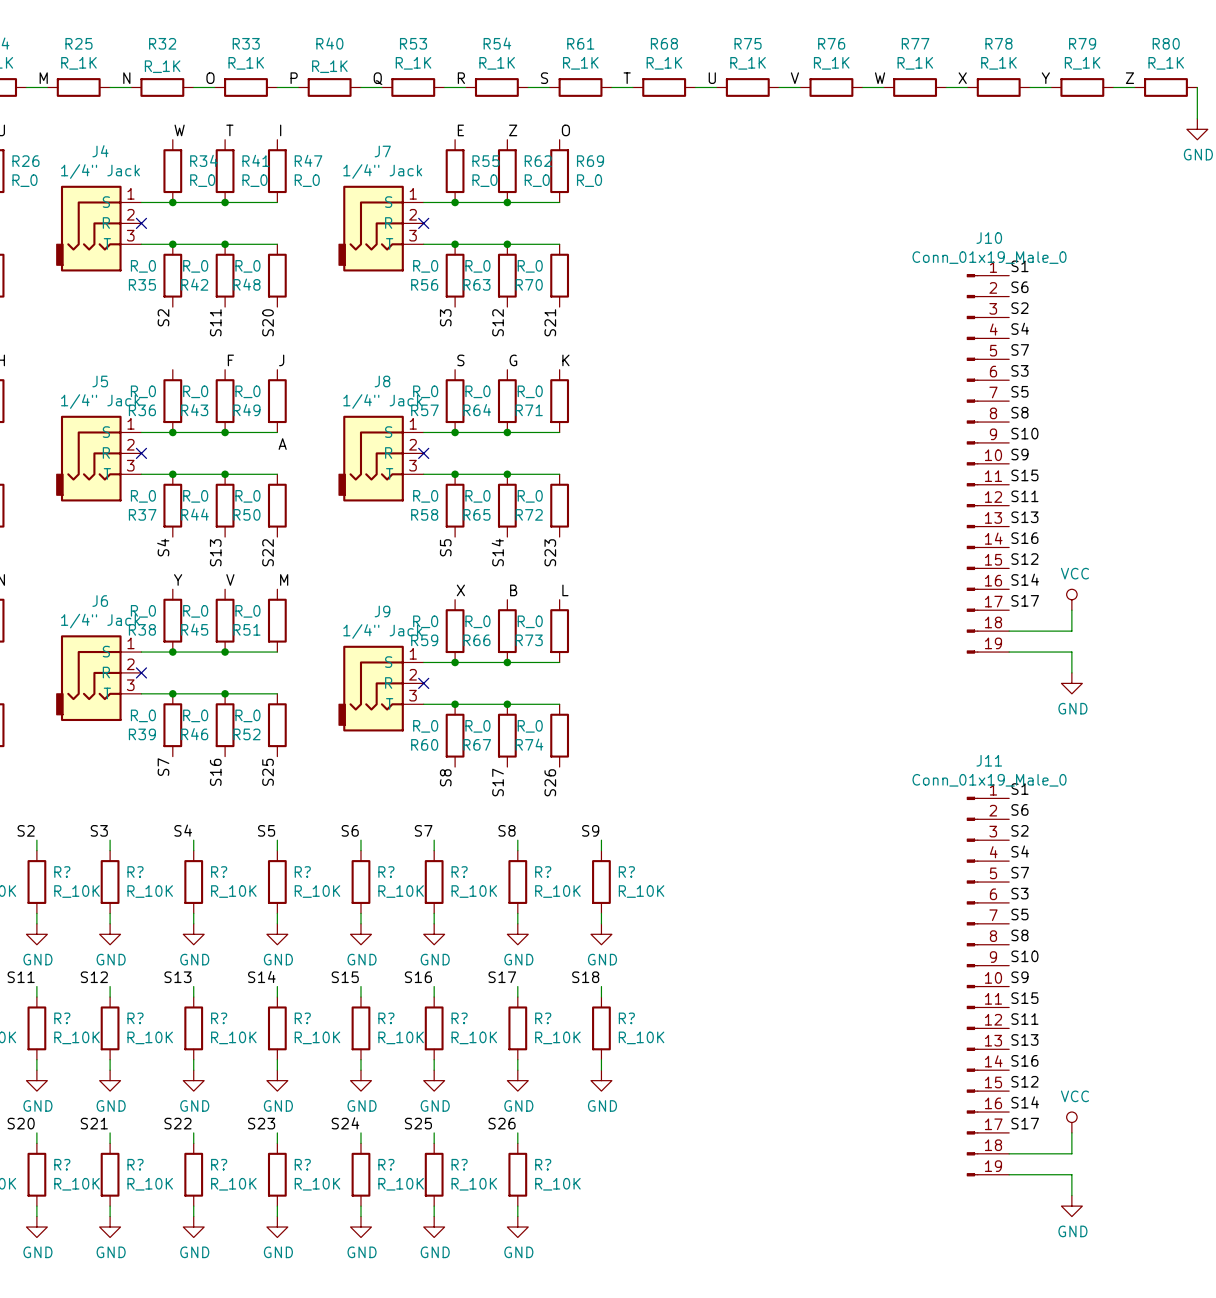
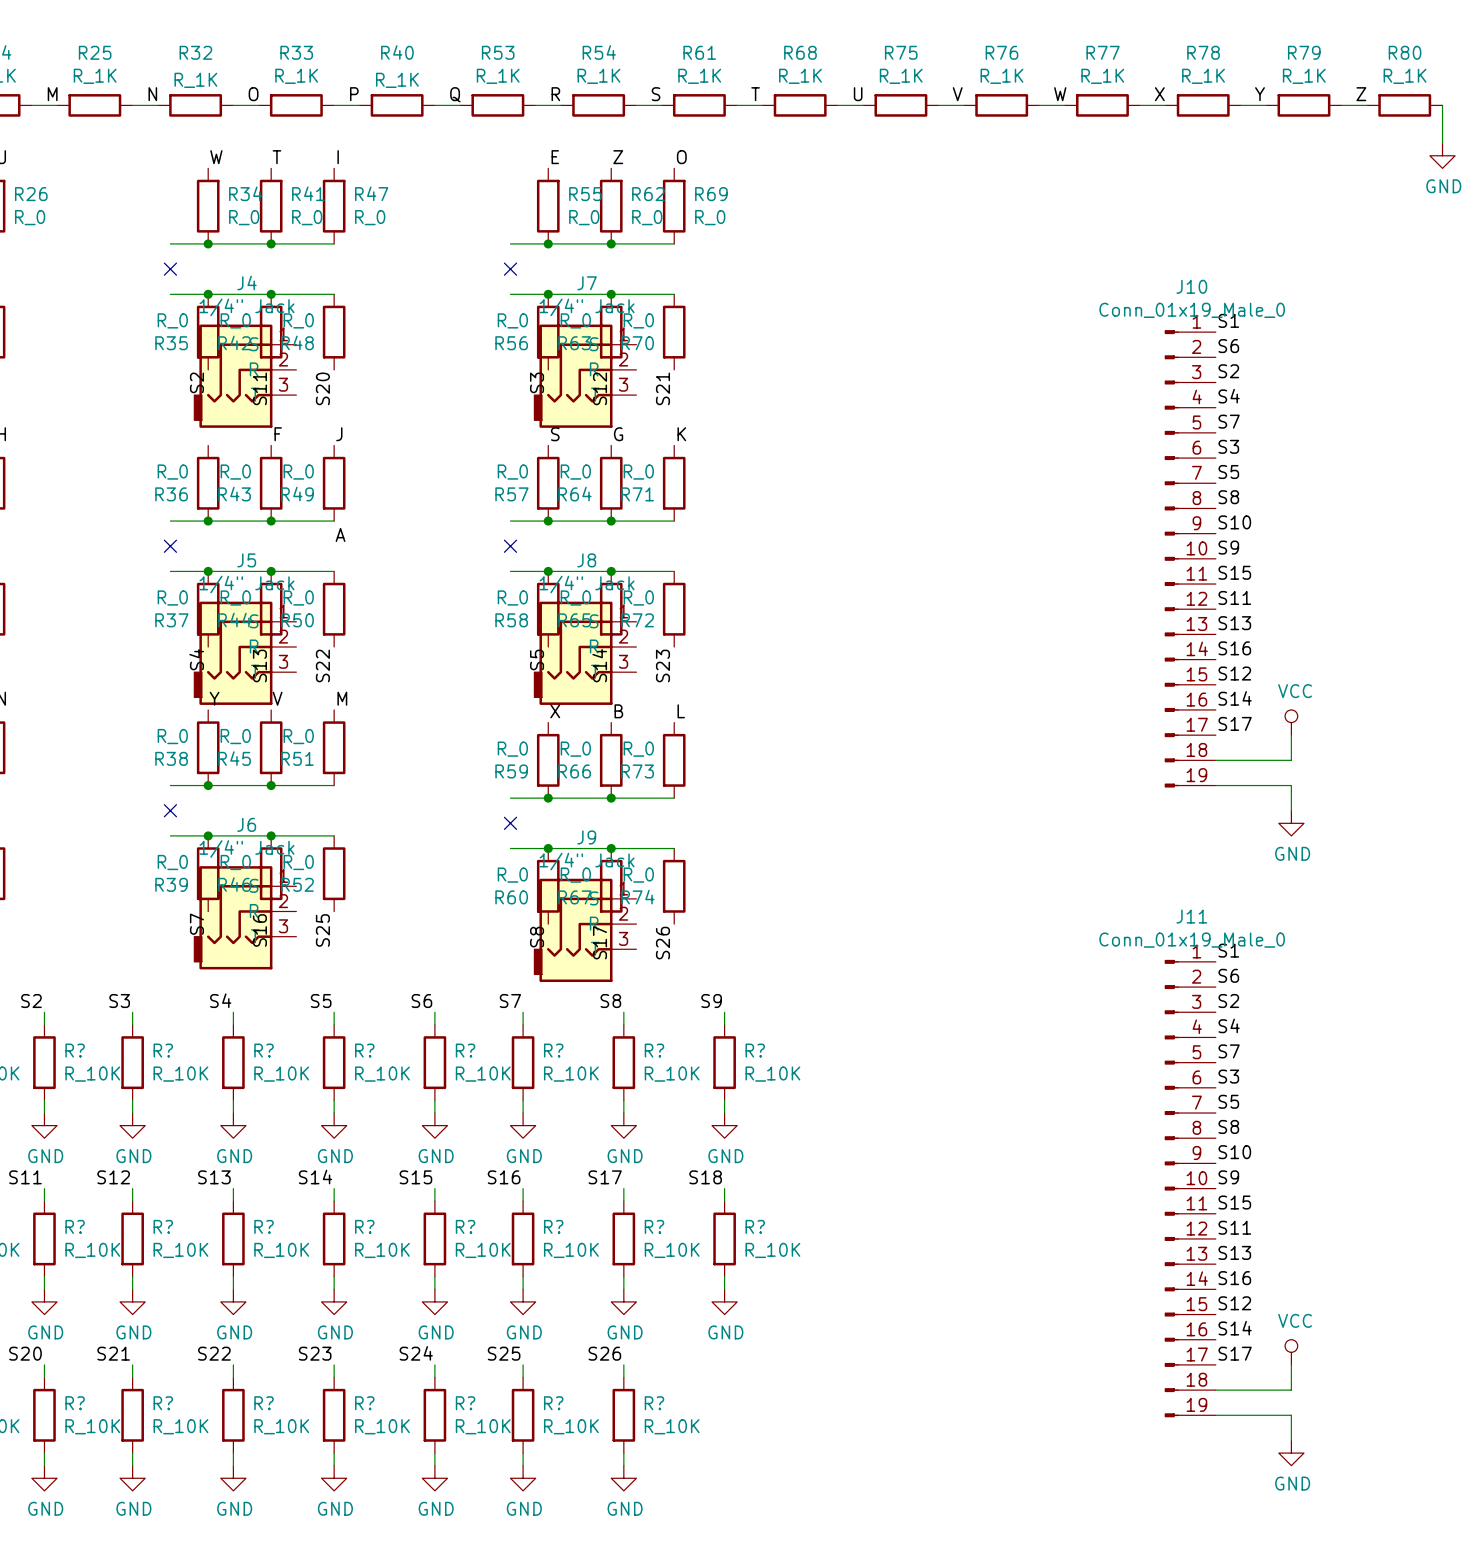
J4 position: (99, 228) -> (245, 376)
J7 position: (381, 228) -> (585, 376)
J5 position: (99, 458) -> (245, 653)
J8 position: (381, 458) -> (585, 653)
J6 position: (99, 678) -> (245, 917)
J9 position: (381, 688) -> (585, 930)

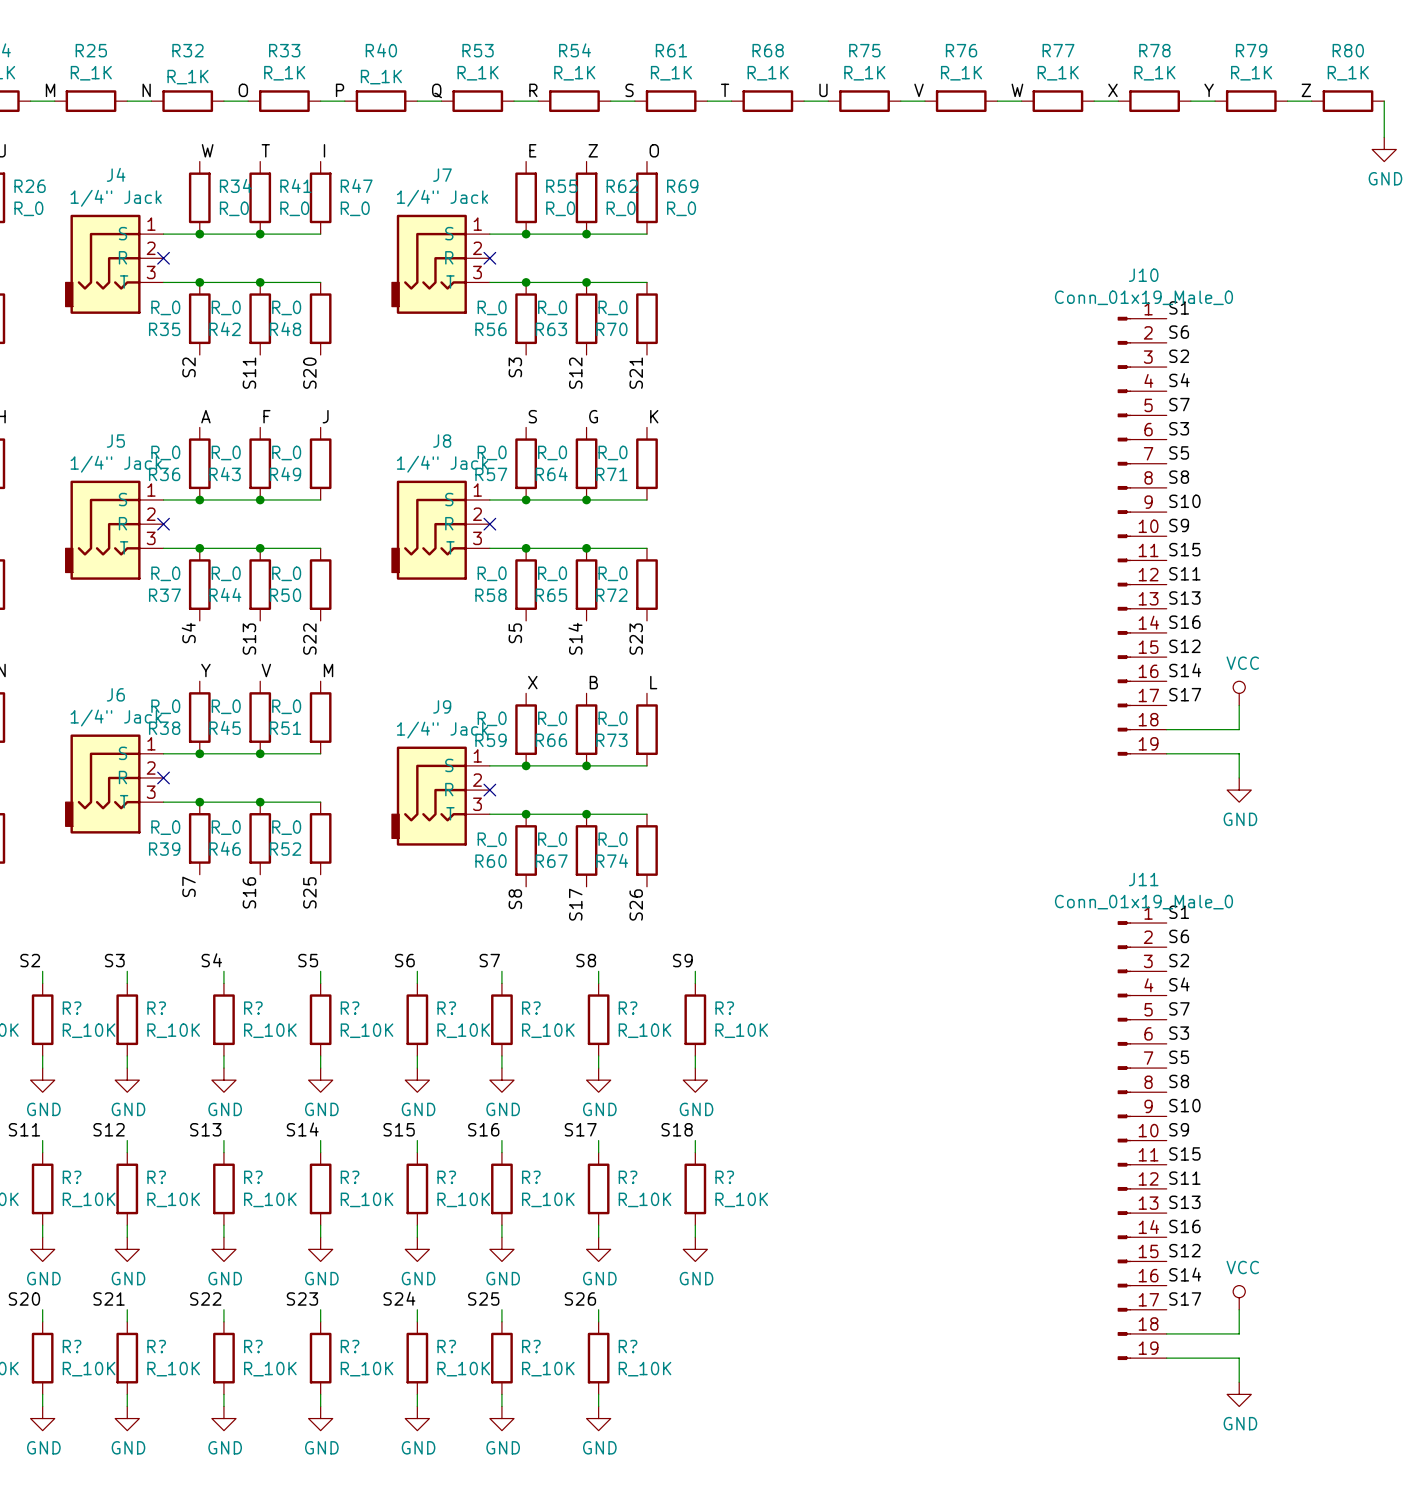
J4 position: (245, 376) -> (114, 264)
J7 position: (585, 376) -> (440, 264)
label position: A (340, 534) -> A (205, 416)
J5 position: (245, 653) -> (114, 530)
J8 position: (585, 653) -> (440, 530)
J6 position: (245, 917) -> (114, 784)
J9 position: (585, 930) -> (440, 796)

